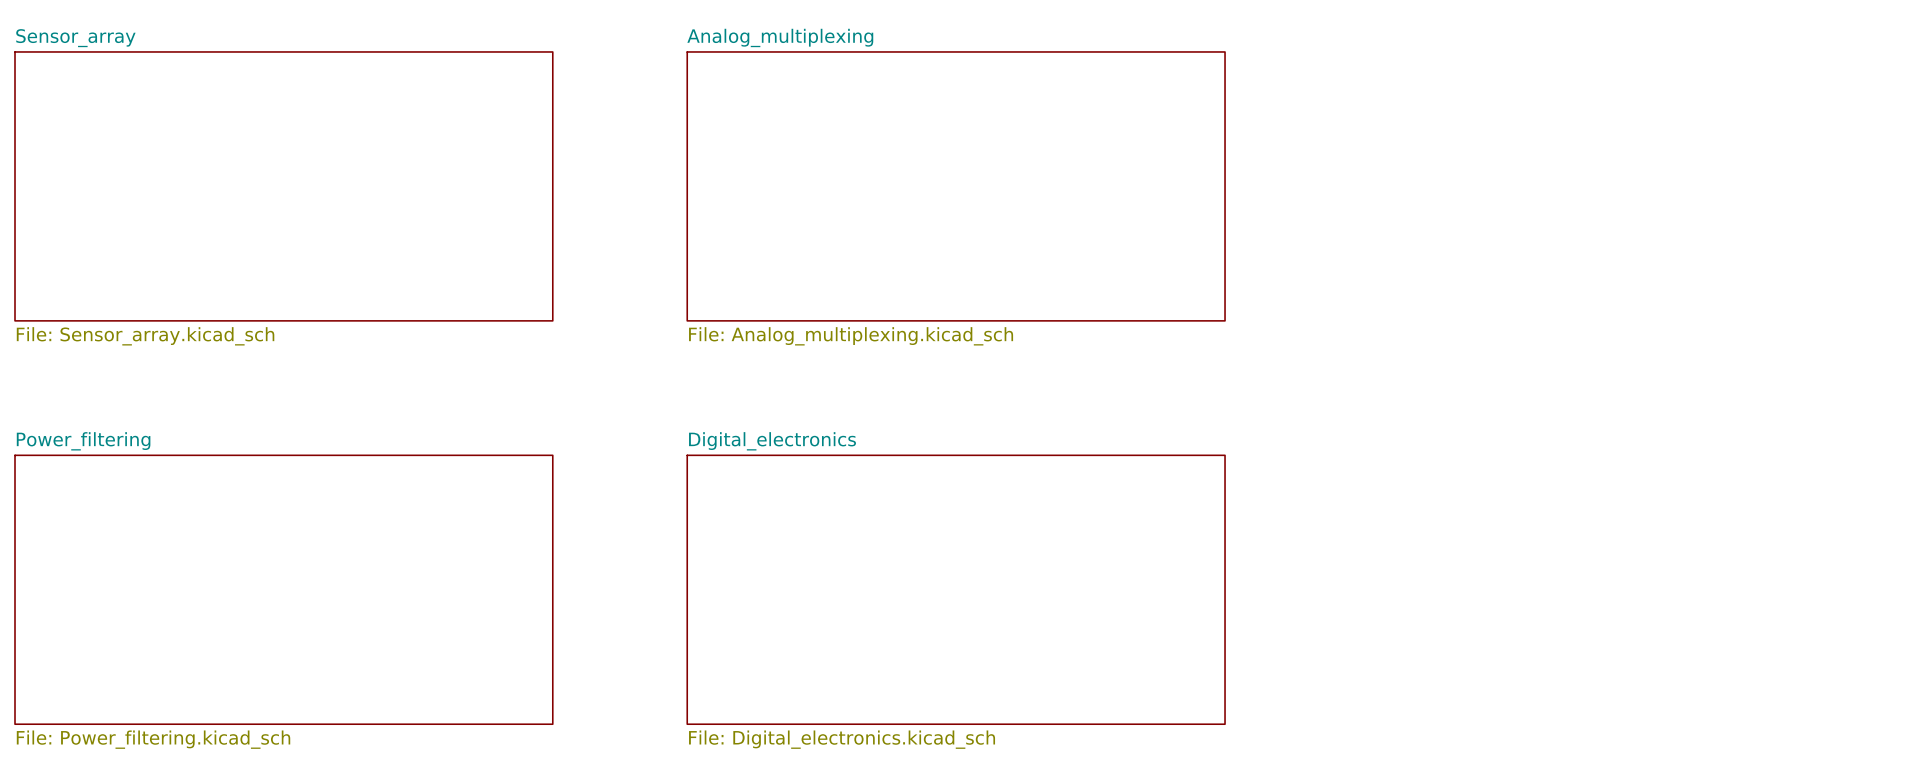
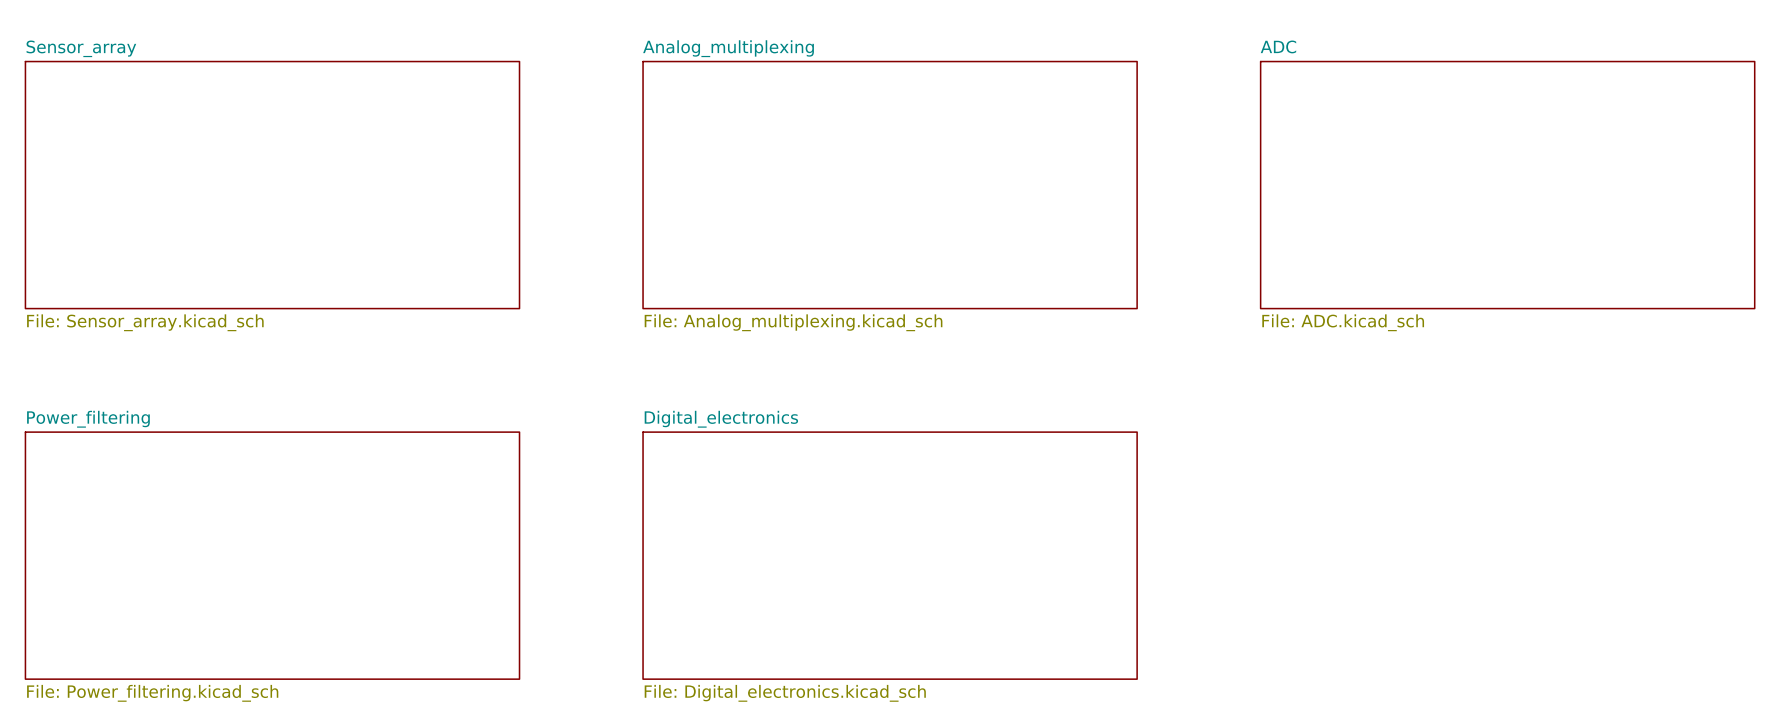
sheet ADC: none -> File: ADC.kicad_sch (1507, 185)

